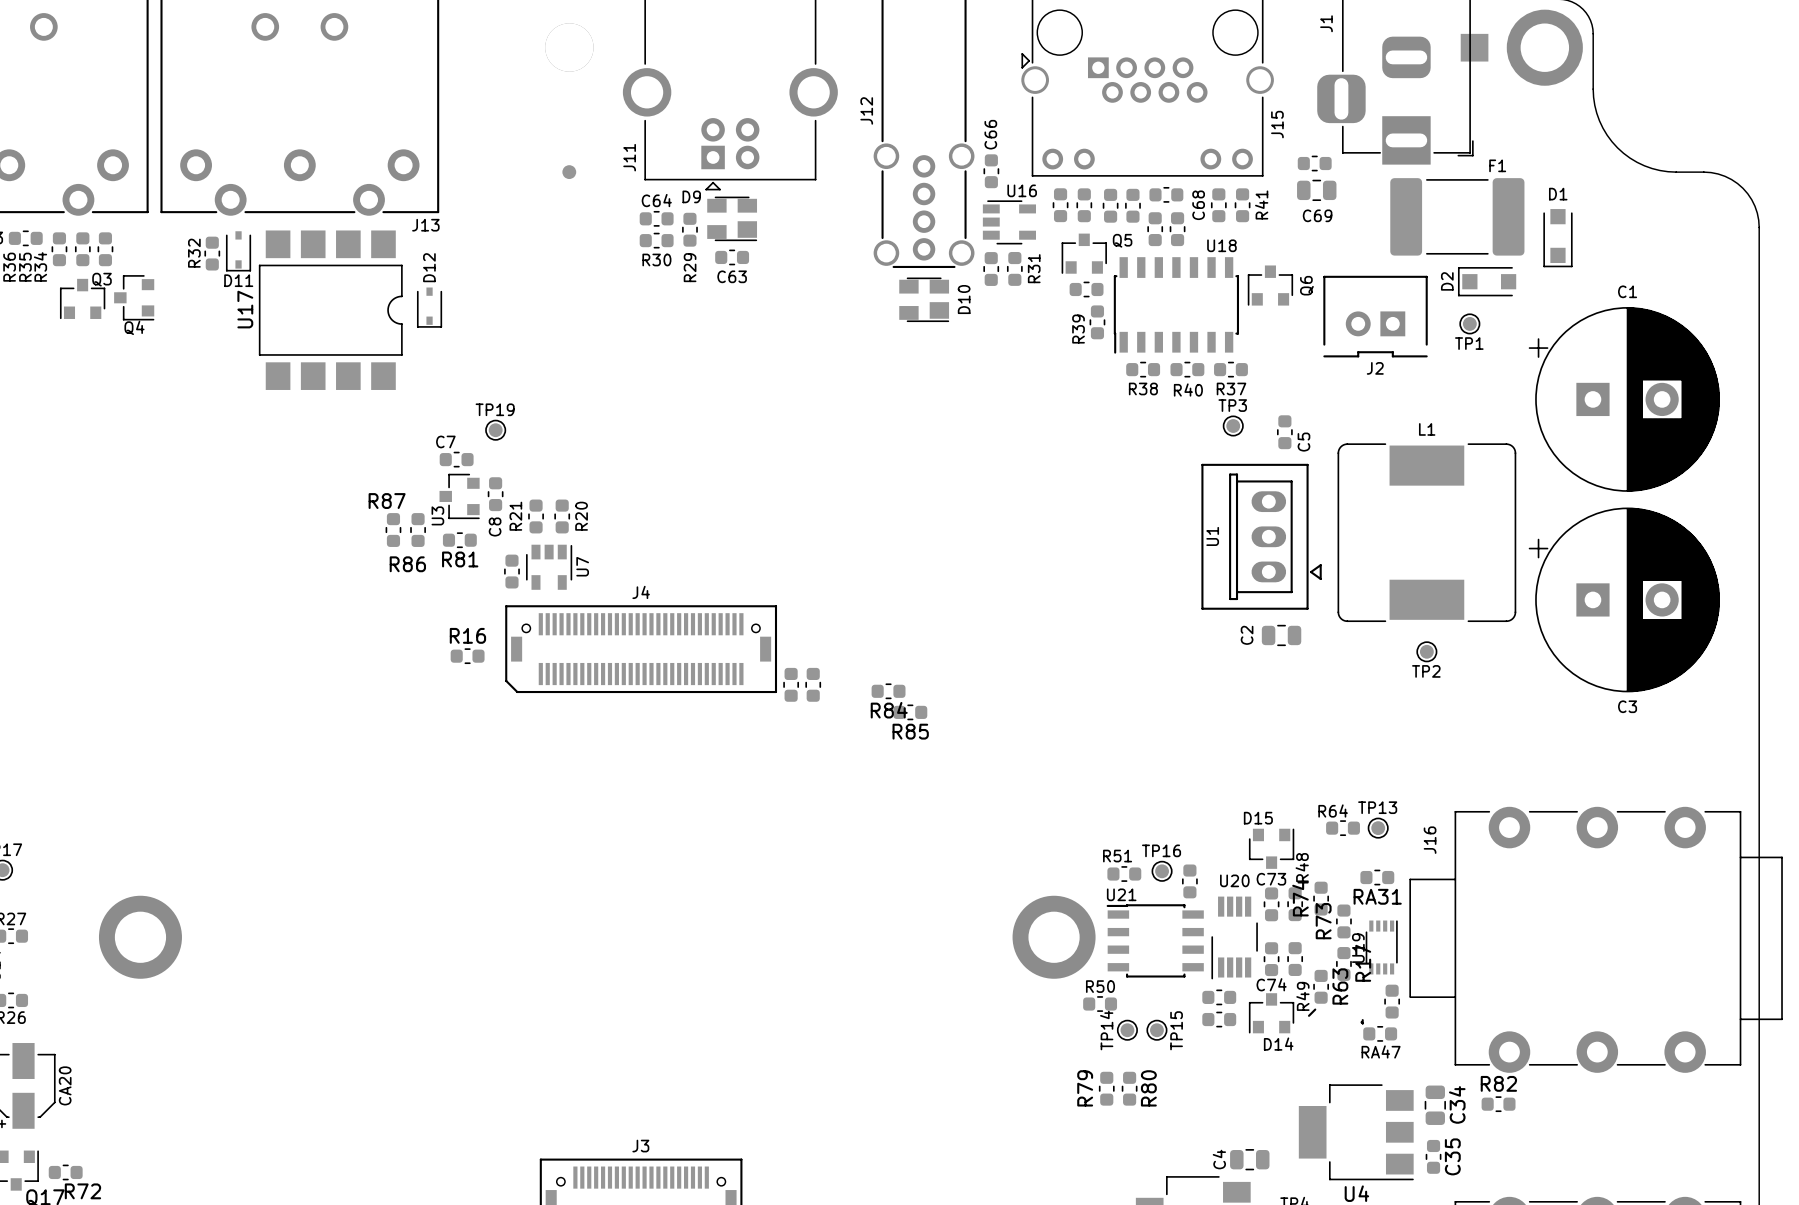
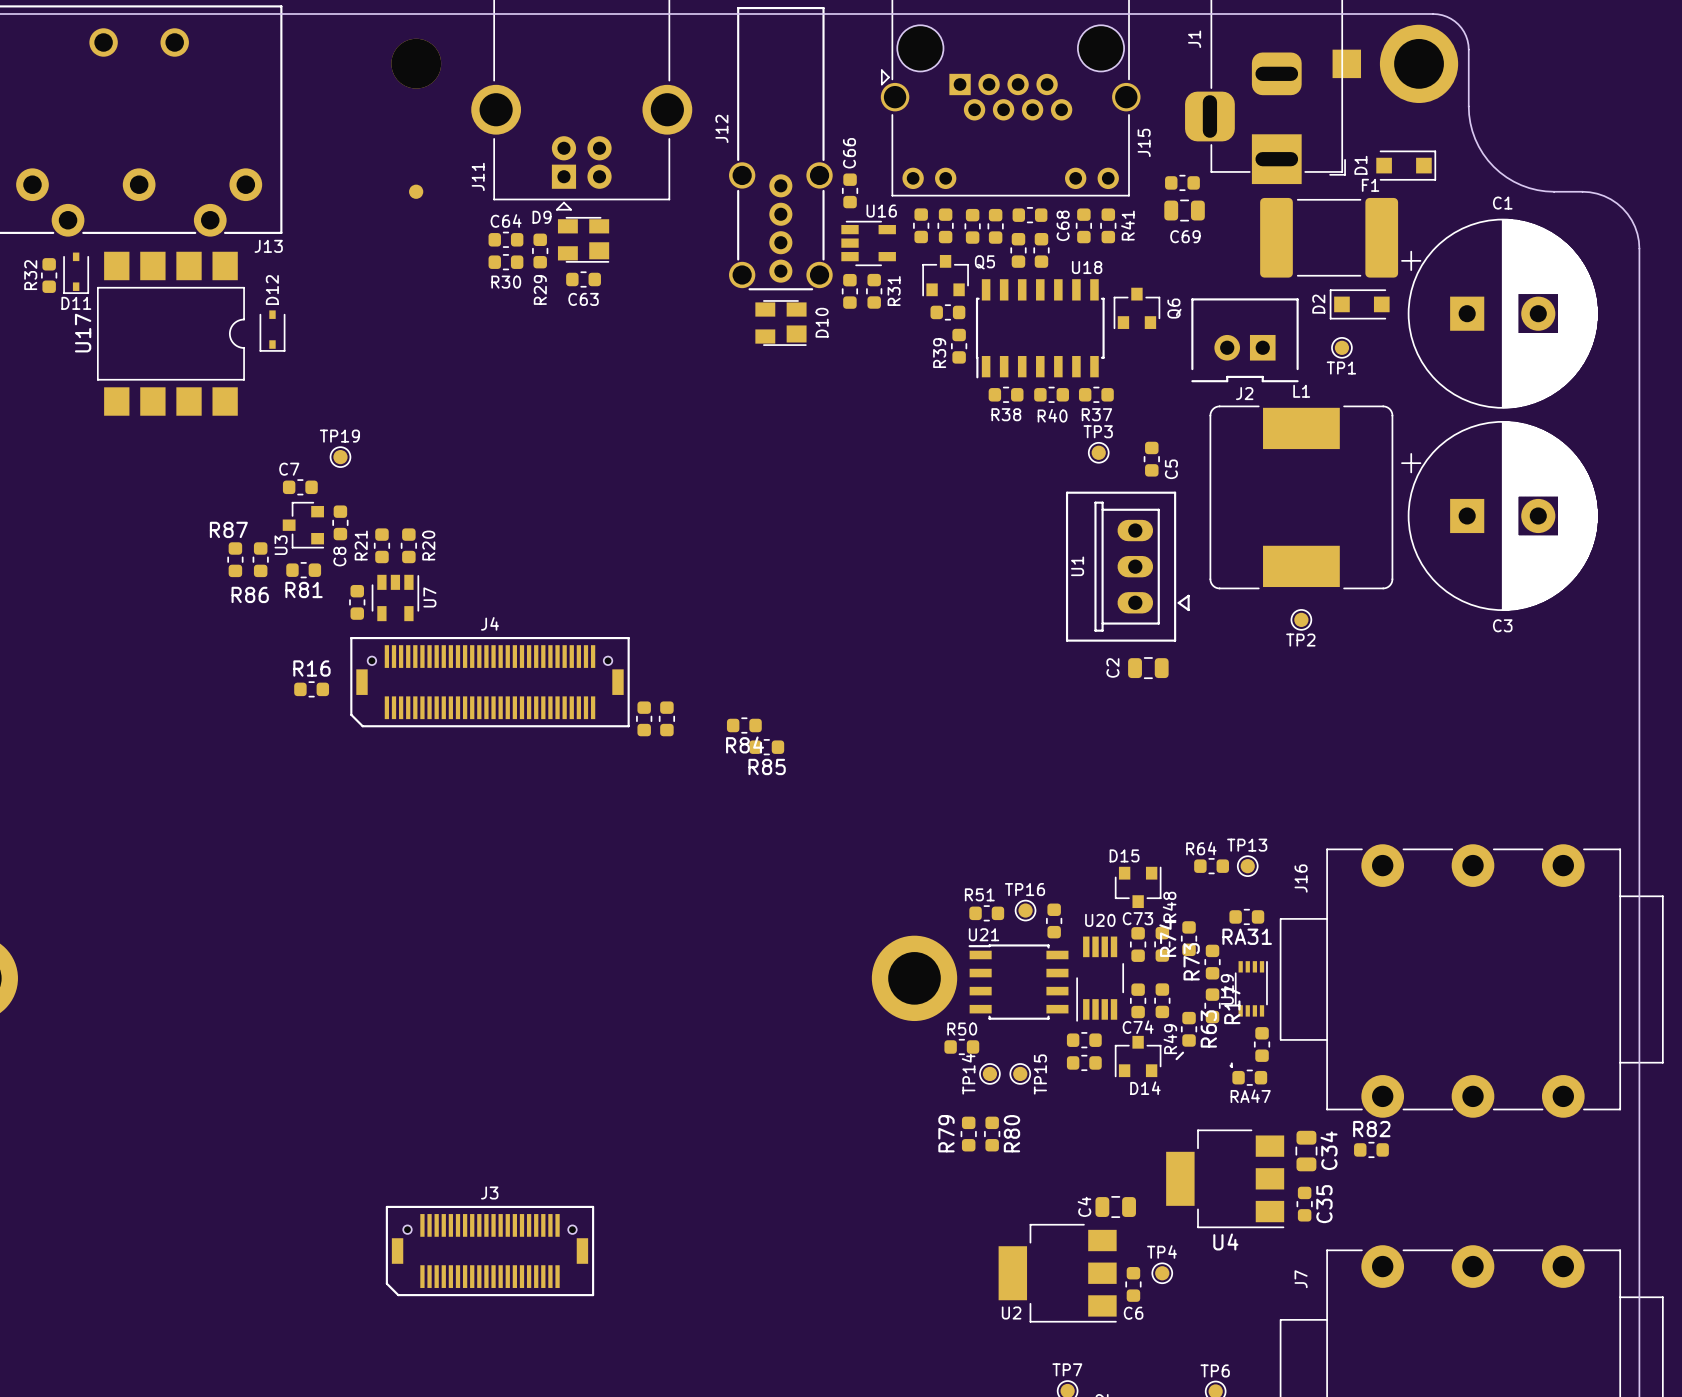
D1 rotation: 0° (1557, 238) -> 90° counterclockwise (1406, 165)
D1 position: (1557, 238) -> (1406, 165)
C1 position: (1624, 399) -> (1499, 313)
L1 position: (1426, 532) -> (1301, 497)
C3 position: (1624, 599) -> (1499, 515)
TP2 position: (1426, 651) -> (1301, 619)

